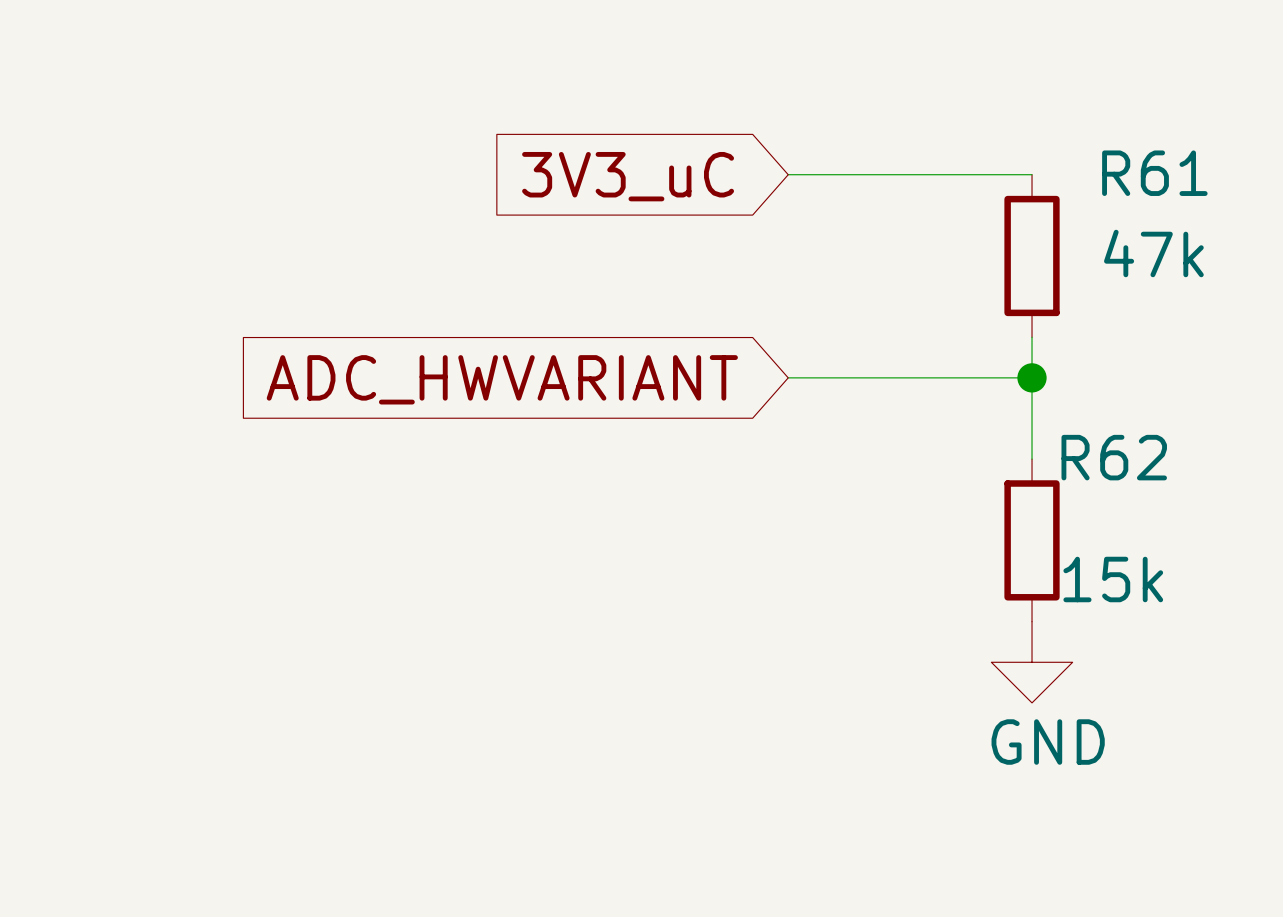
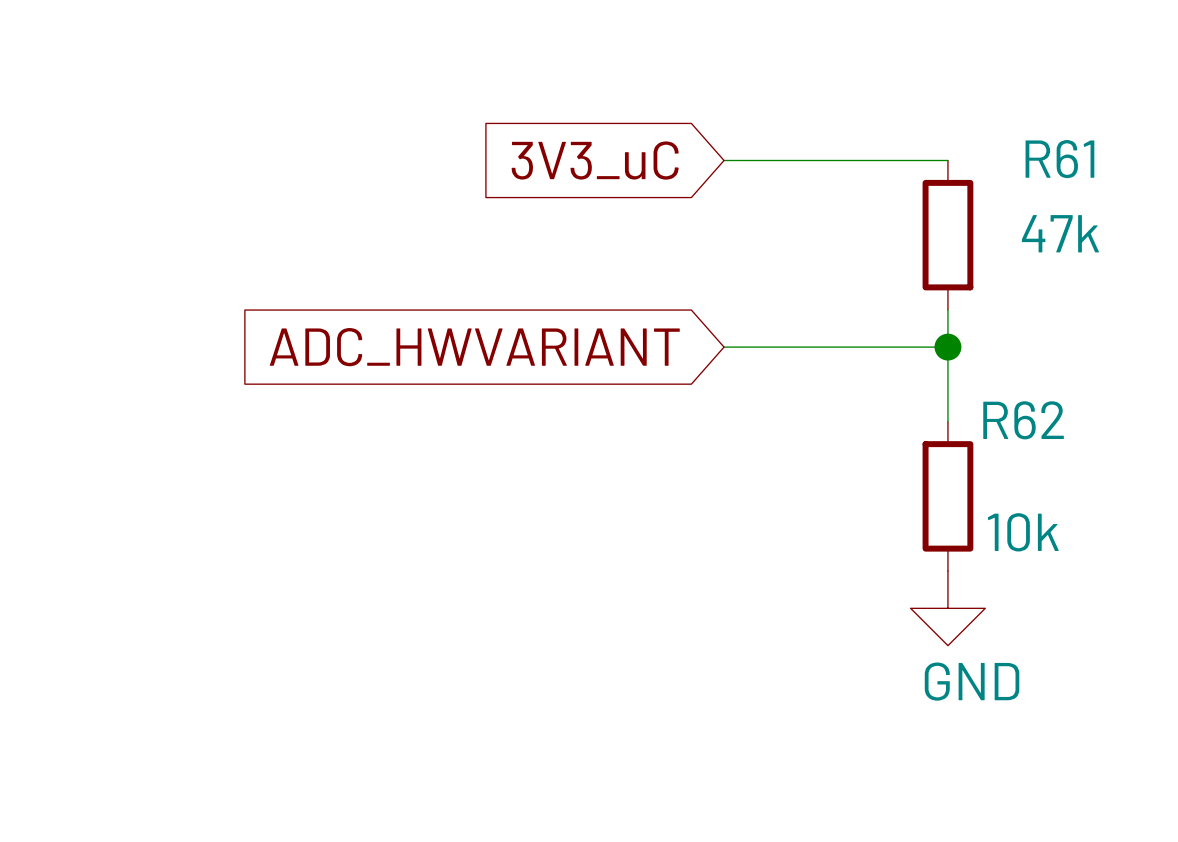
R62 value: 15k (1113, 579) -> 10k (1023, 532)

